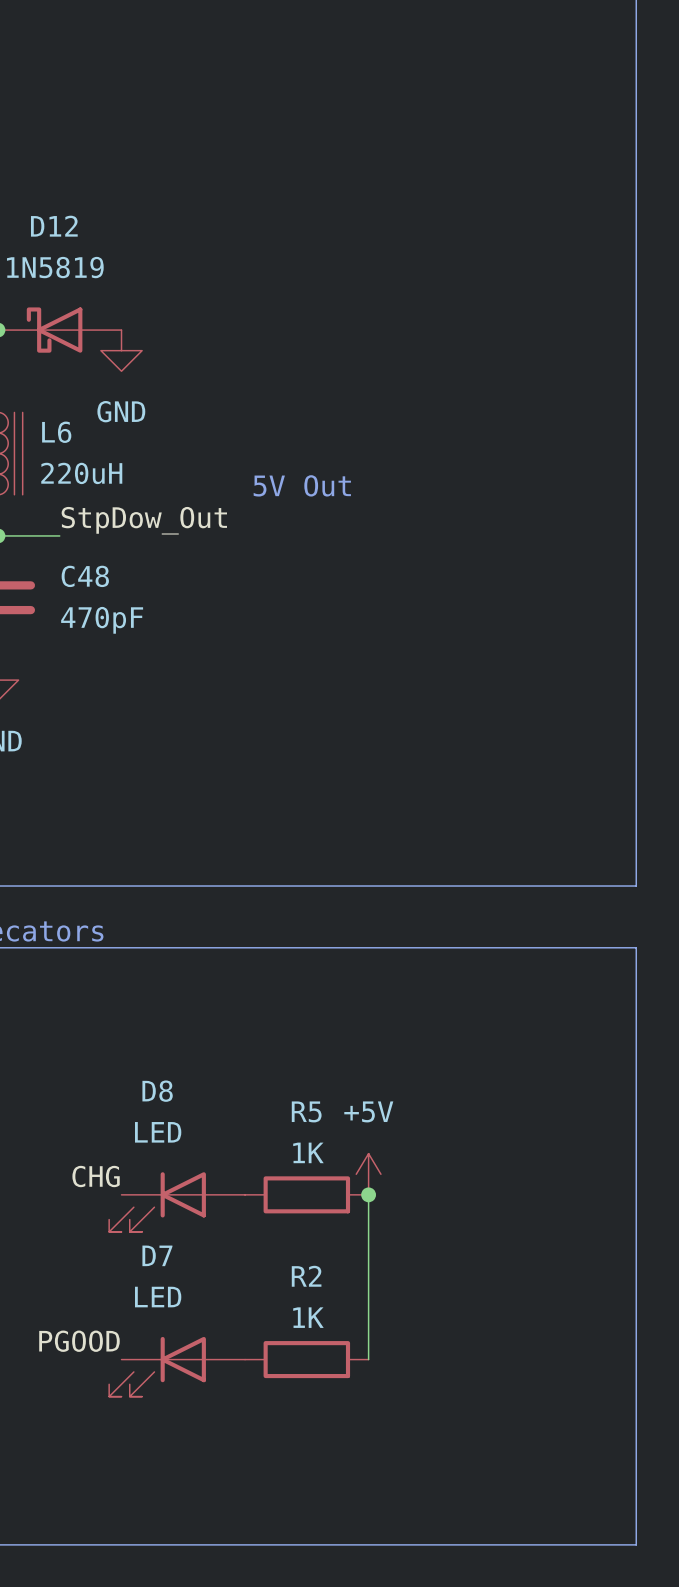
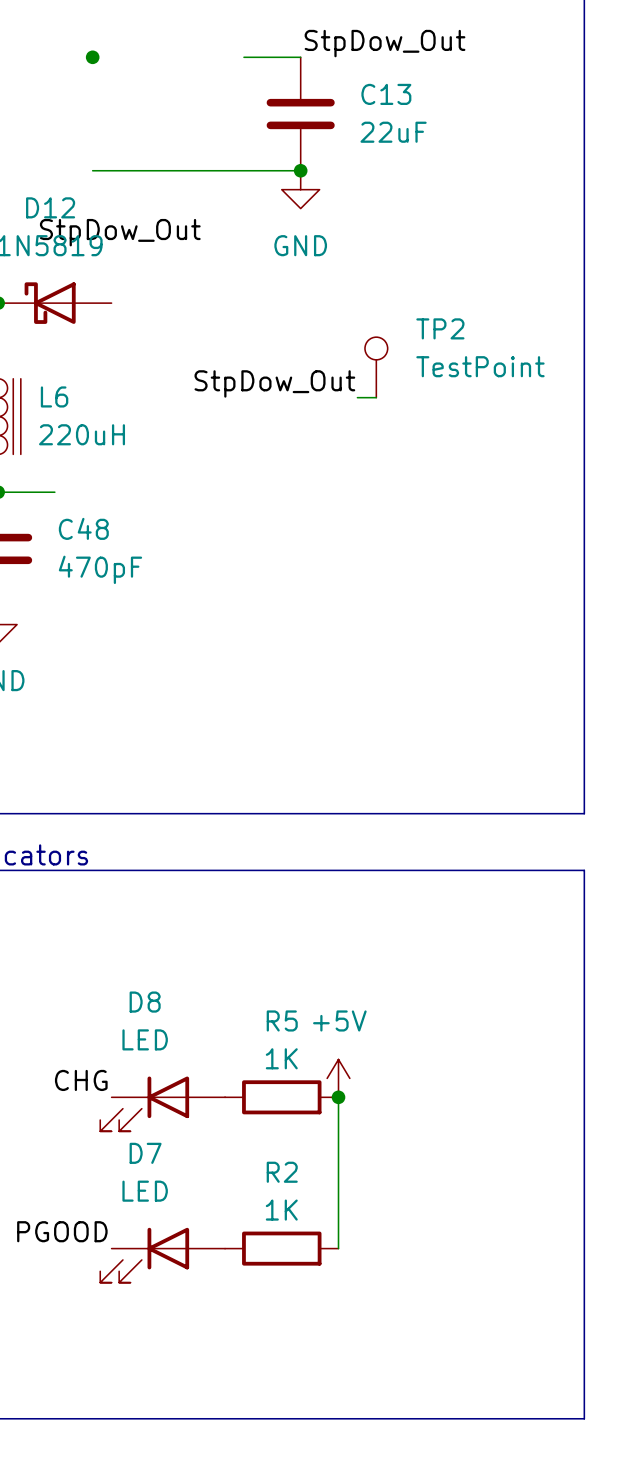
label: none -> StpDow_Out (385, 43)
junction: none -> (92, 57)
wire: none -> (243, 57) (300, 57)
C13: none -> 22uF (300, 114)
wire: none -> (92, 170) (300, 170)
junction: none -> (300, 170)
power symbol: none -> GND (300, 189)
label: none -> StpDow_Out (120, 232)
power symbol: GND (121, 350) -> none
TP2: none -> TestPoint (376, 367)
label: none -> StpDow_Out (274, 383)
wire: none -> (357, 397) (376, 397)
text: 5V Out (302, 485) -> none
label: StpDow_Out (144, 520) -> none

